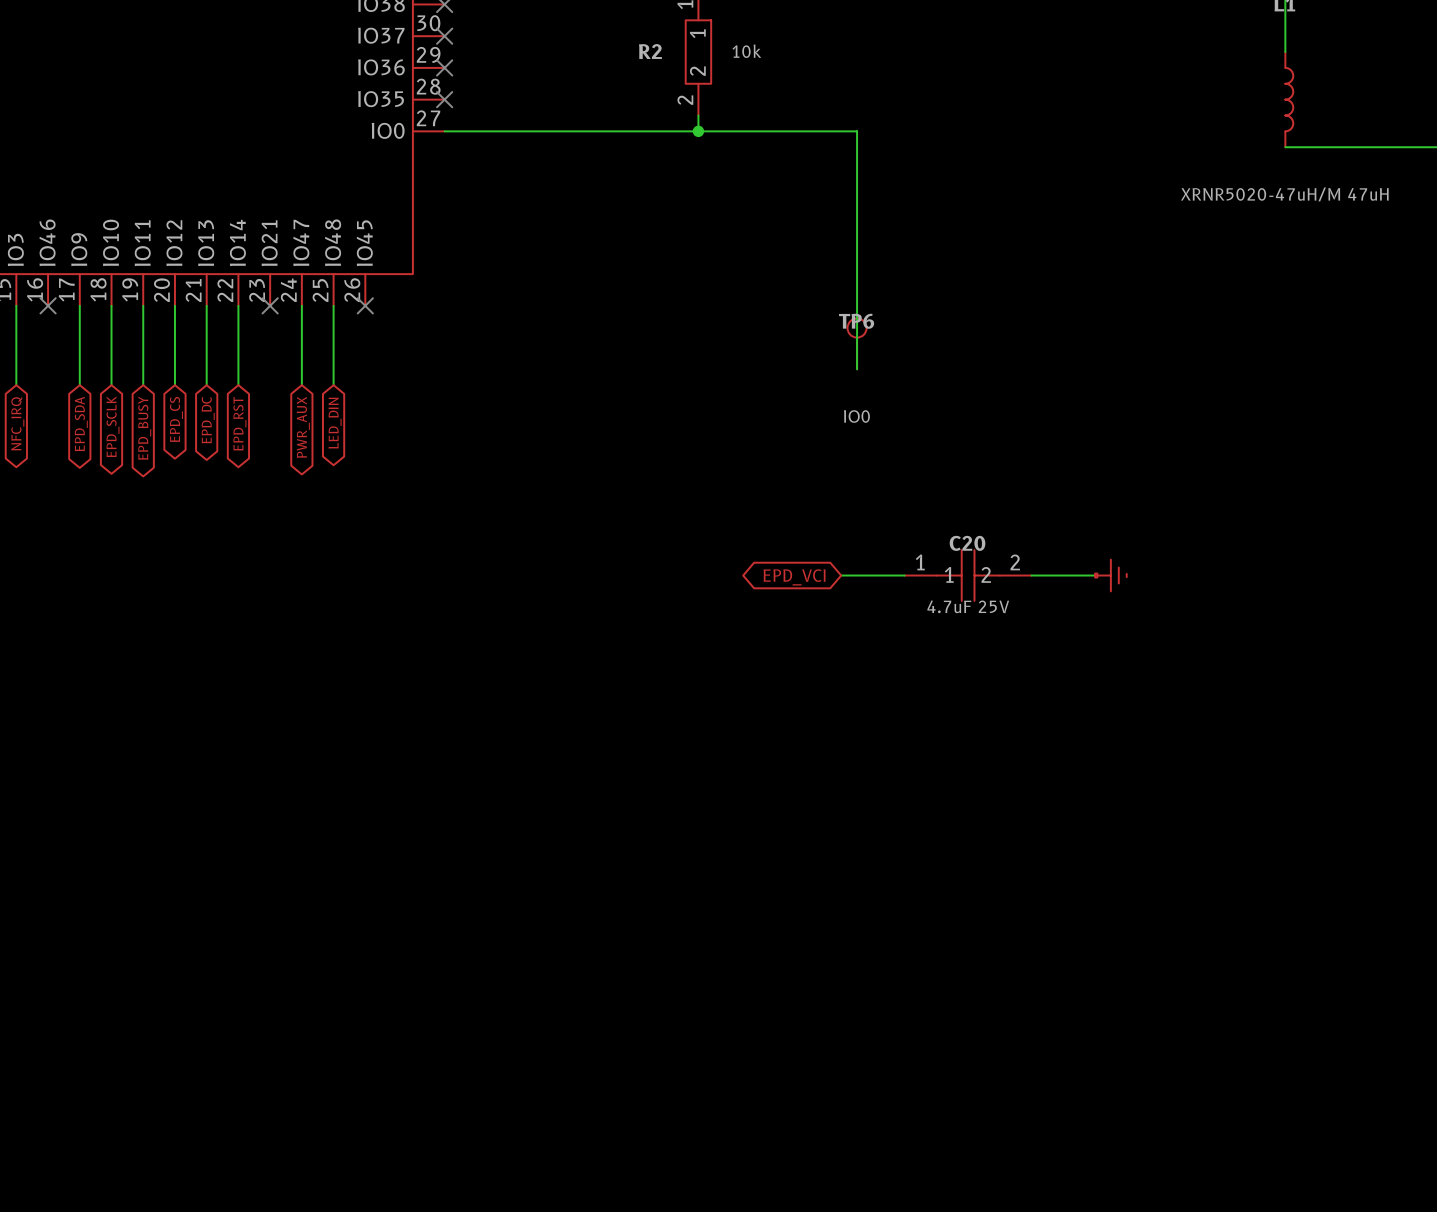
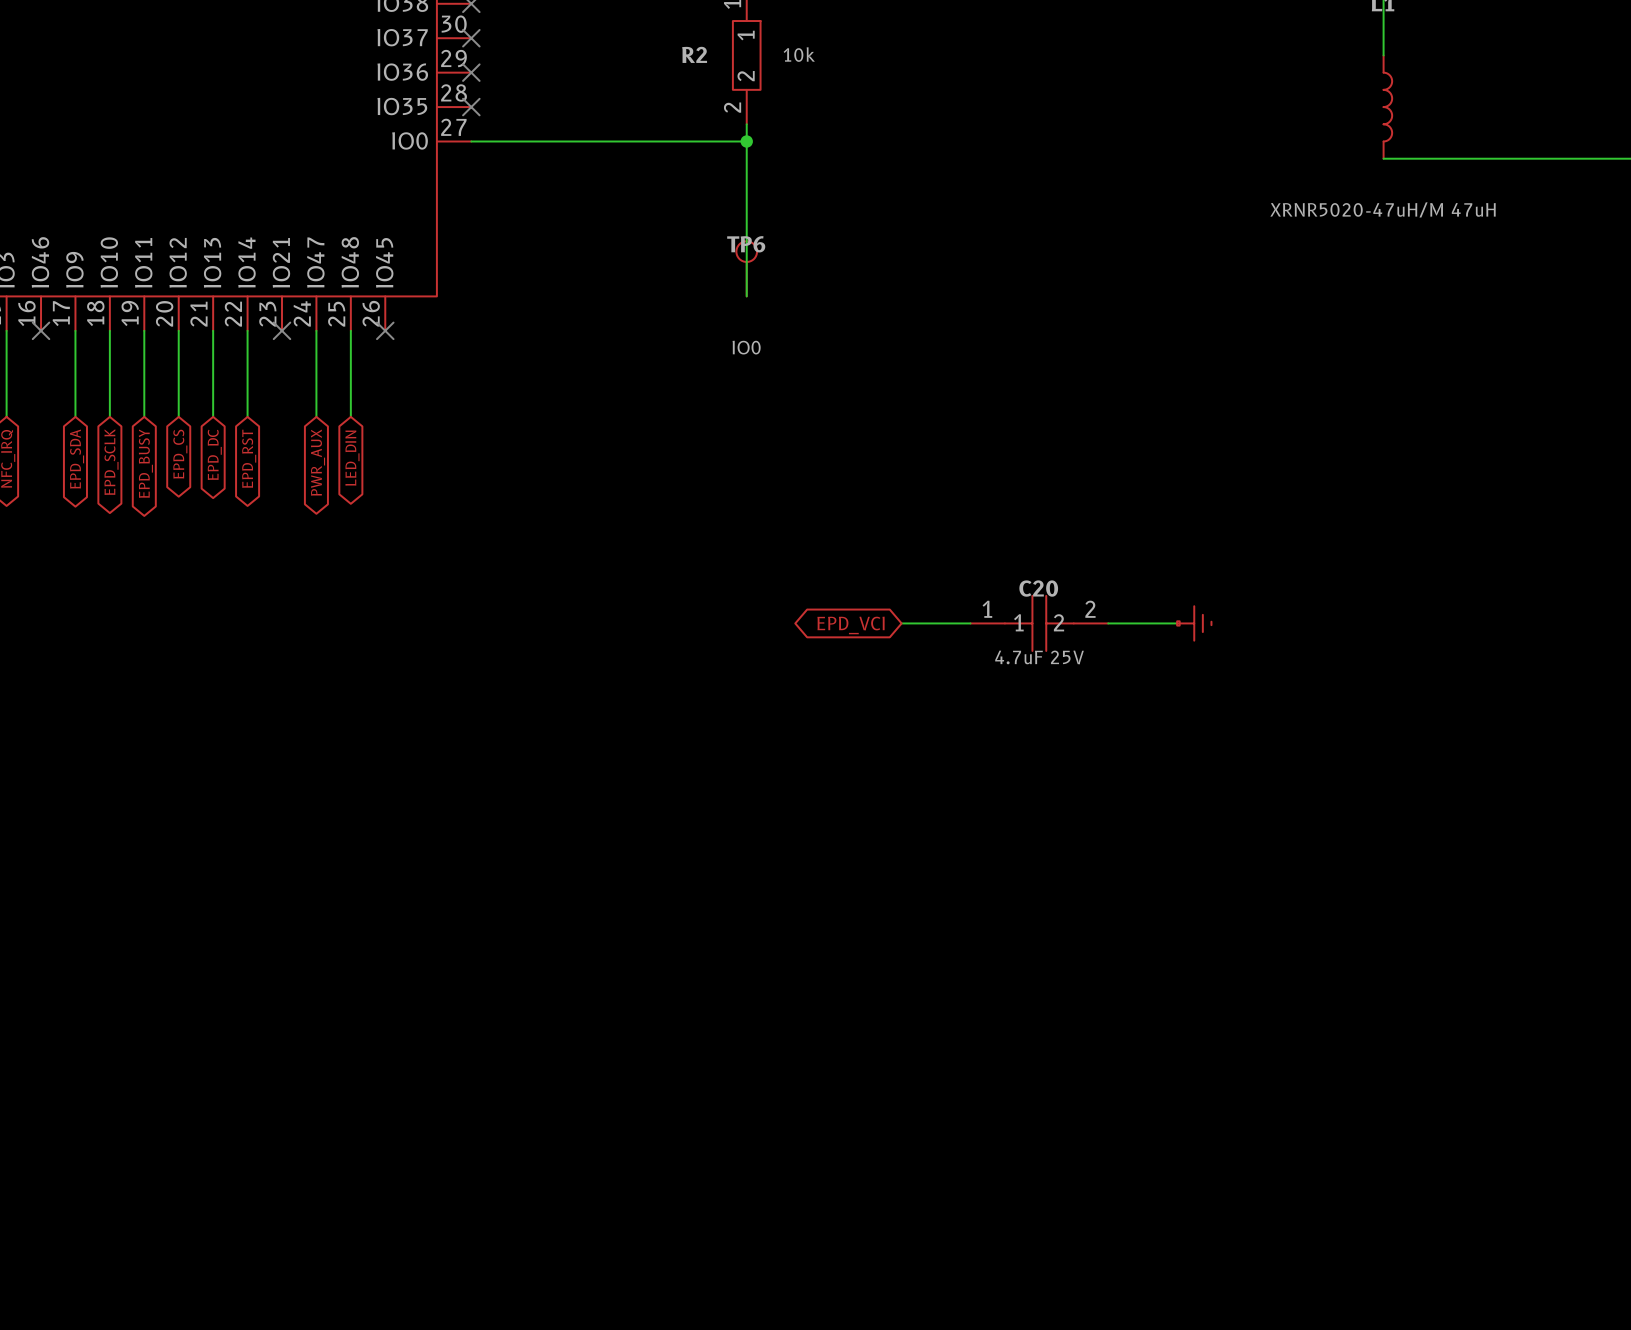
wire: (698, 131) (857, 131) (857, 369) -> (746, 141) (746, 296)
TP6 position: (857, 343) -> (746, 268)

